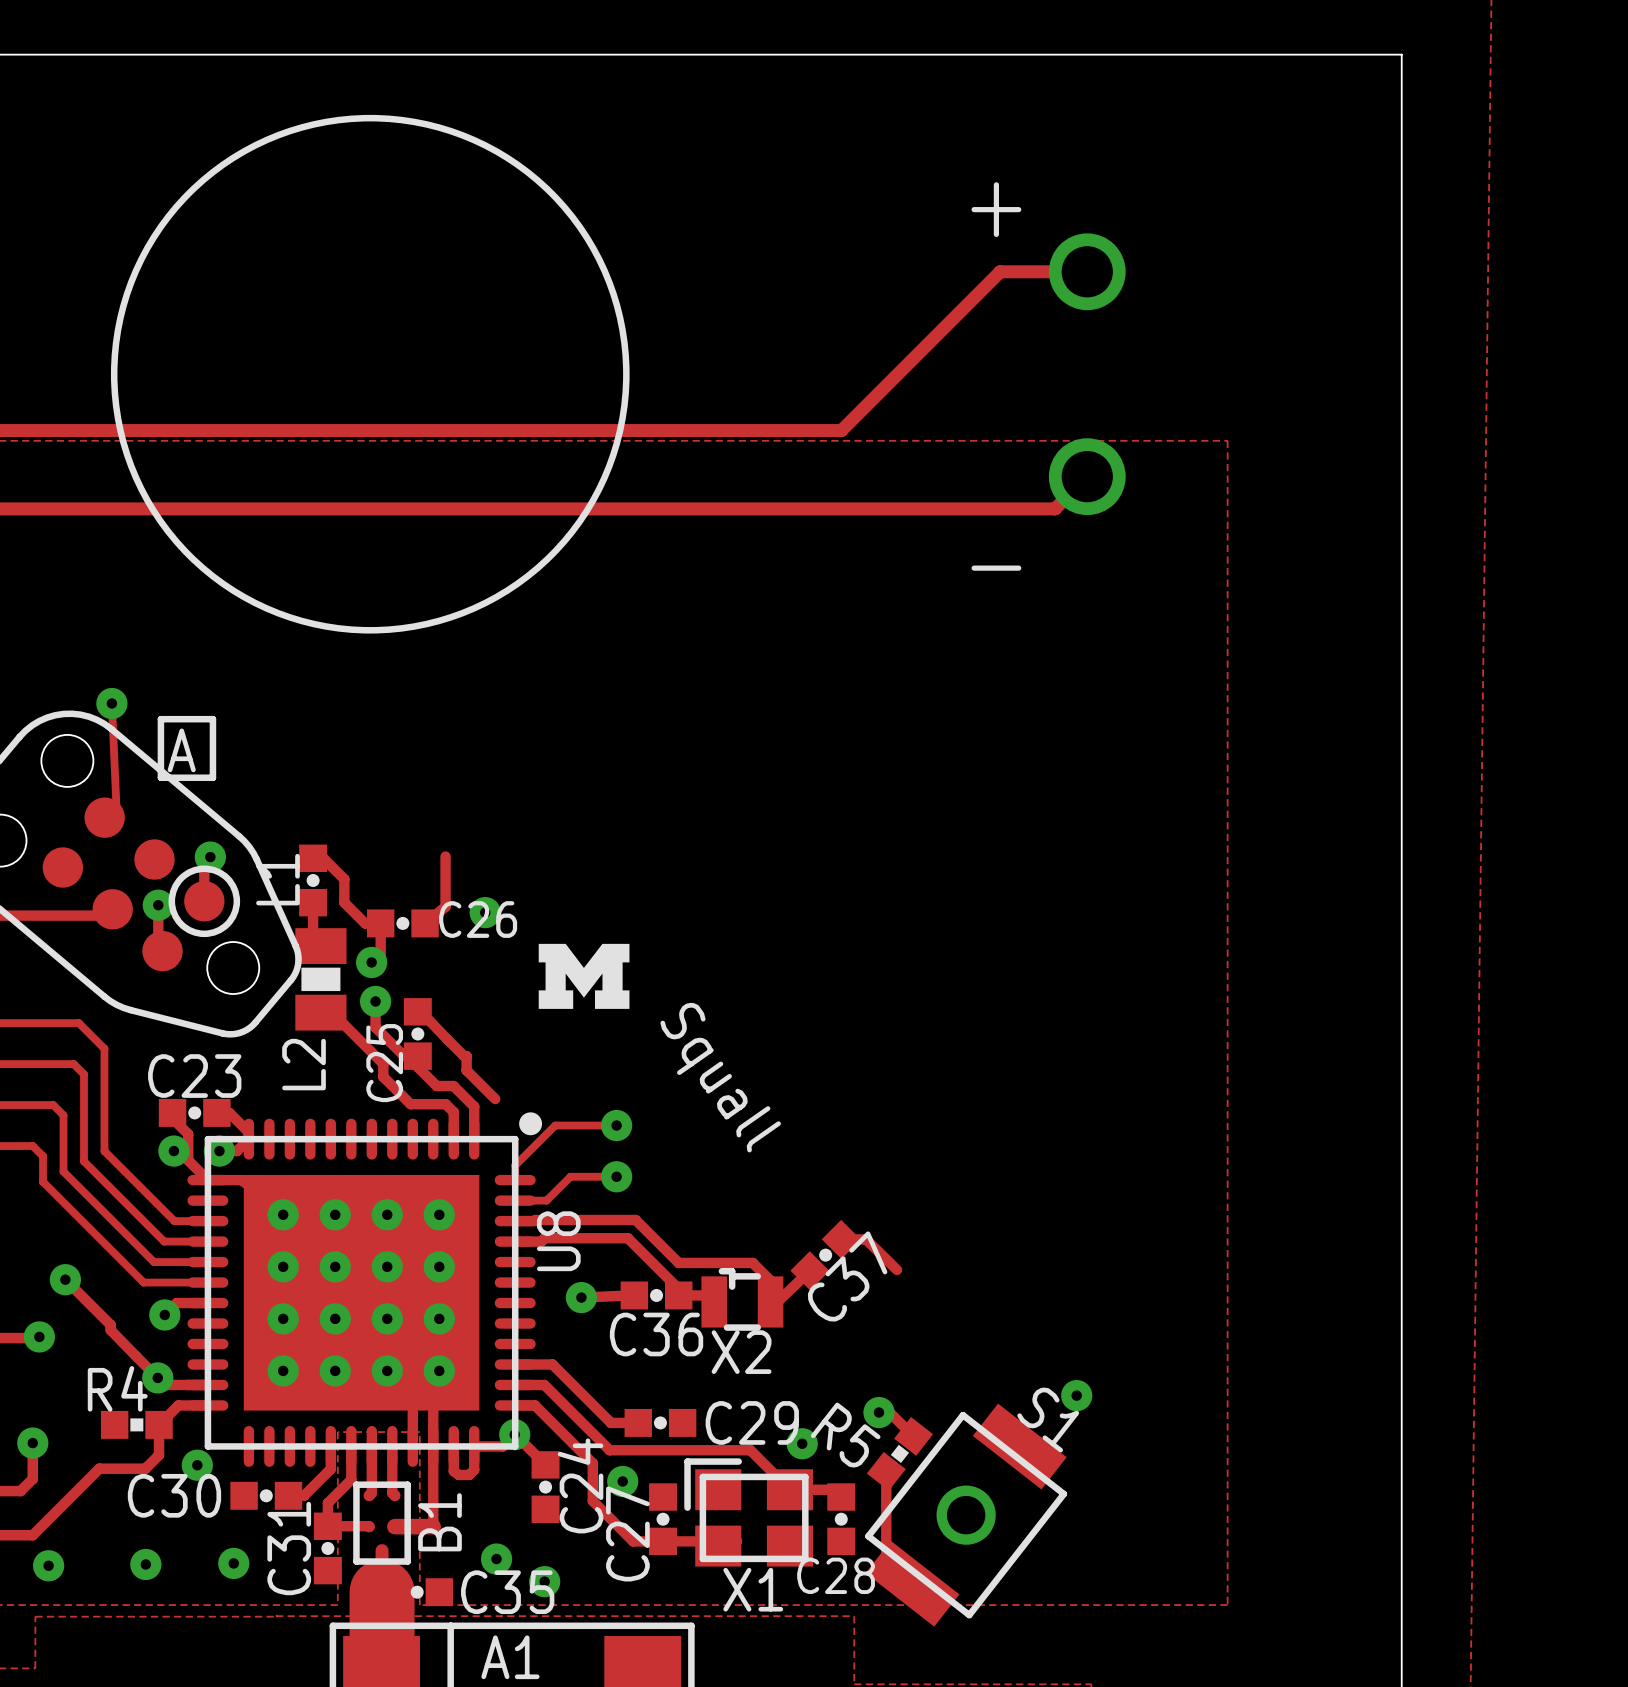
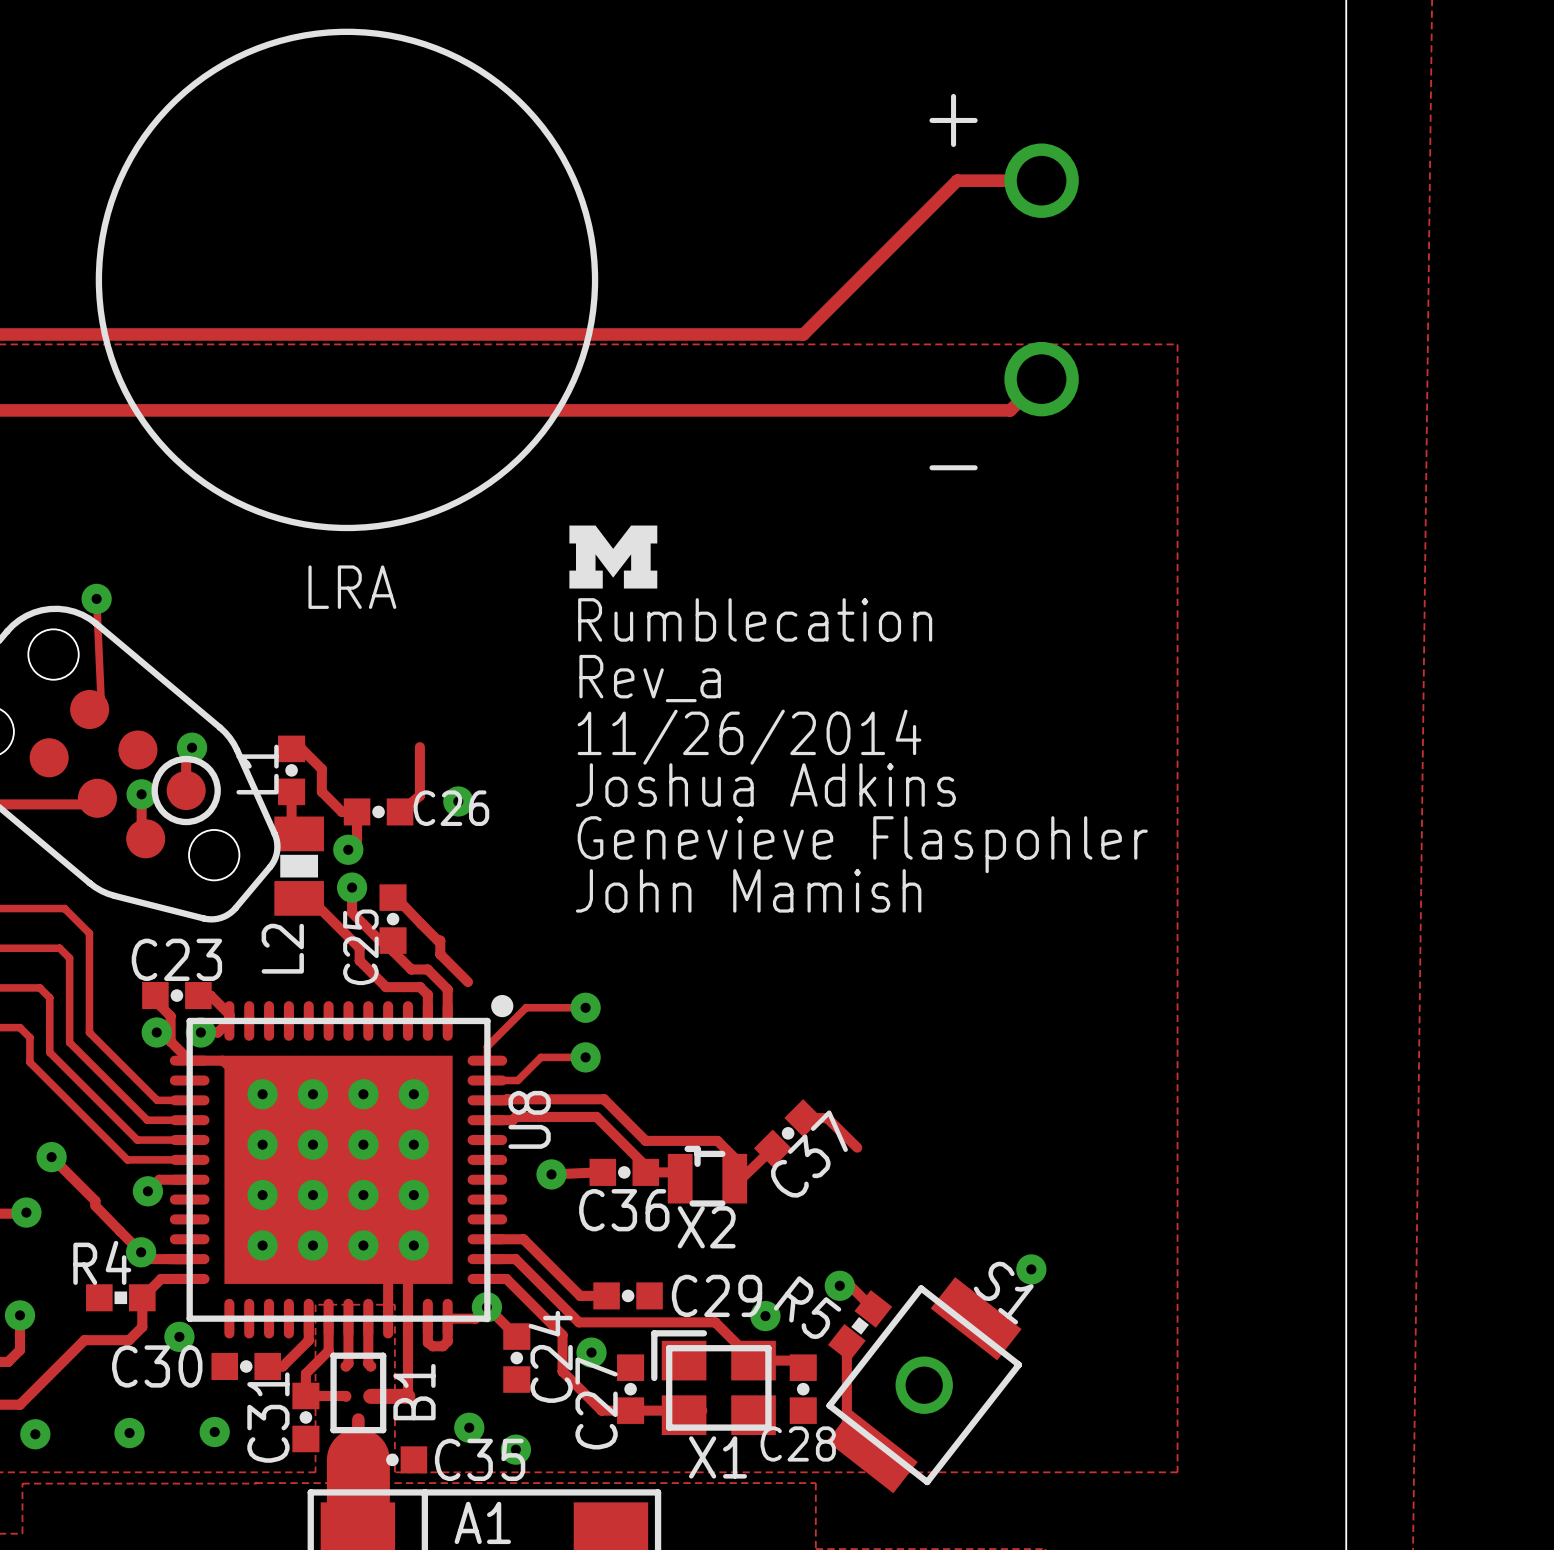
text: none -> LRA (352, 587)
line: (160, 719) (212, 719) (212, 777) (160, 777) (160, 719) -> none
text: none -> Rumblecation (755, 619)
text: A (181, 750) -> none
text: none -> Rev_a (650, 678)
text: none -> 11/26/2014 (749, 737)
text: none -> Joshua Adkins (765, 785)
text: none -> Genevieve Flaspohler (862, 844)
drawing position: (584, 976) -> (613, 557)
text: none -> John Mamish (748, 890)
text: Squall (720, 1077) -> none

